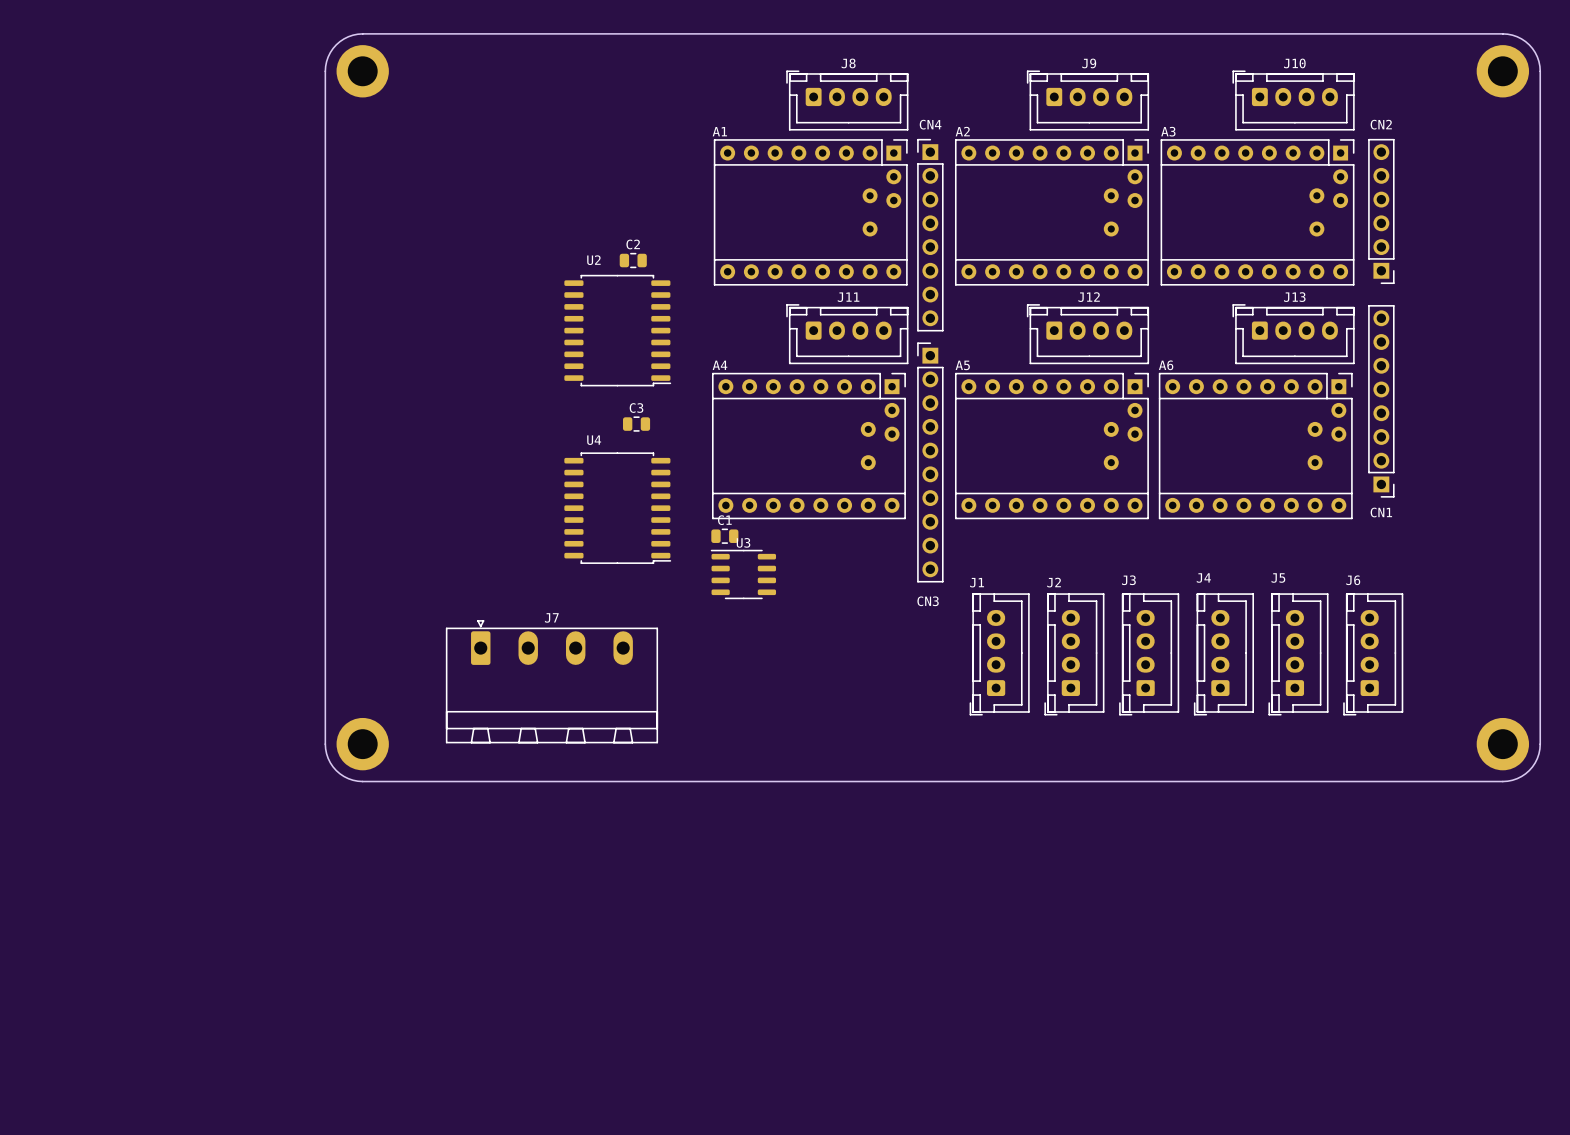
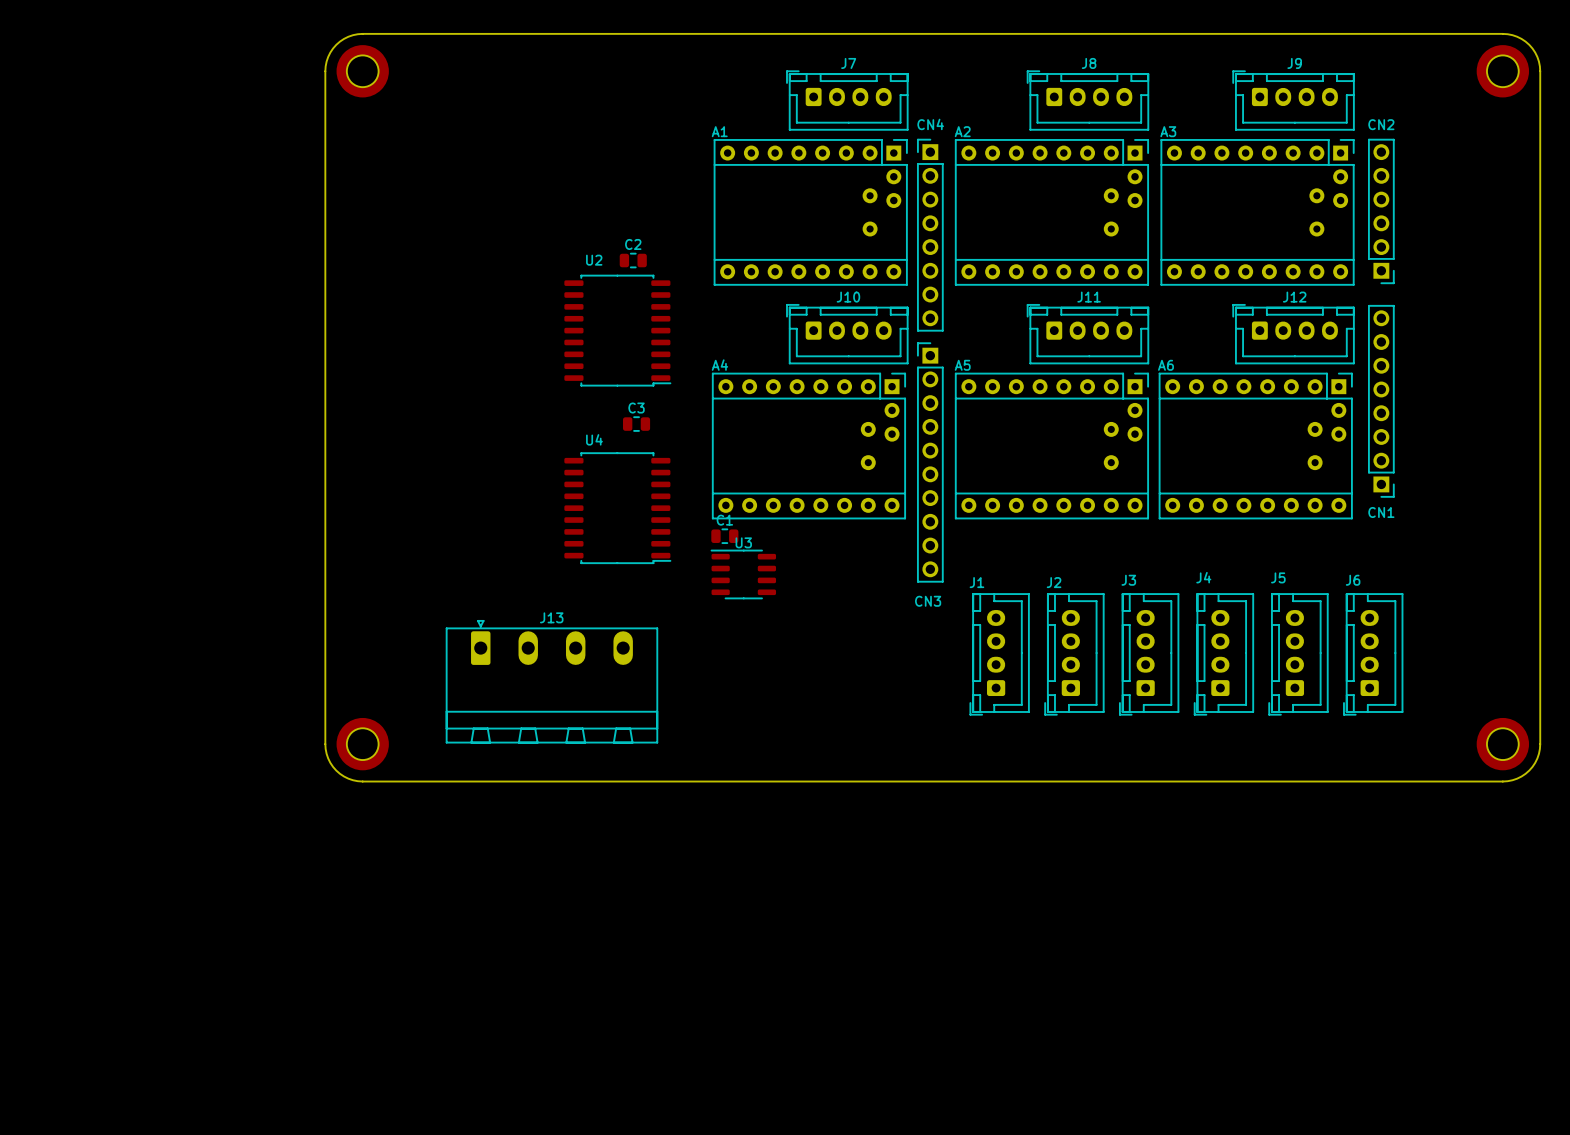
J8 name: J8 (848, 63) -> J7 (848, 63)
J9 name: J9 (1089, 63) -> J8 (1089, 63)
J10 name: J10 (1294, 63) -> J9 (1294, 63)
J11 name: J11 (848, 297) -> J10 (848, 297)
J12 name: J12 (1089, 297) -> J11 (1089, 297)
J13 name: J13 (1294, 297) -> J12 (1294, 297)
J7 name: J7 (551, 617) -> J13 (551, 617)

